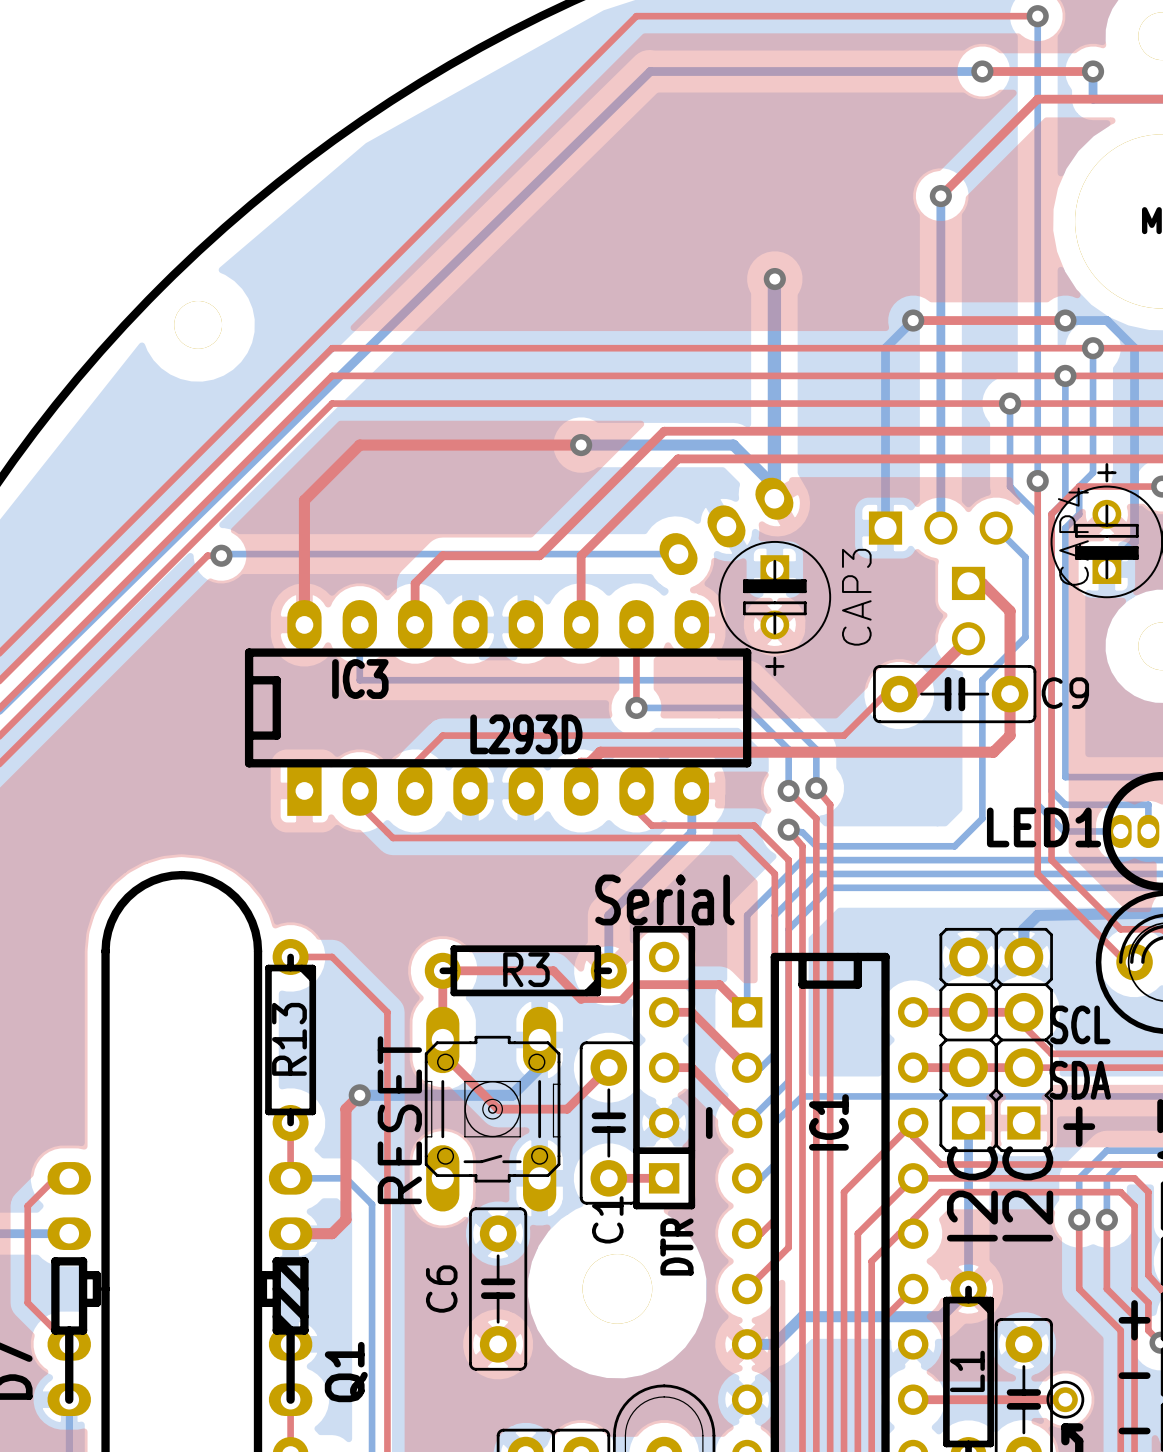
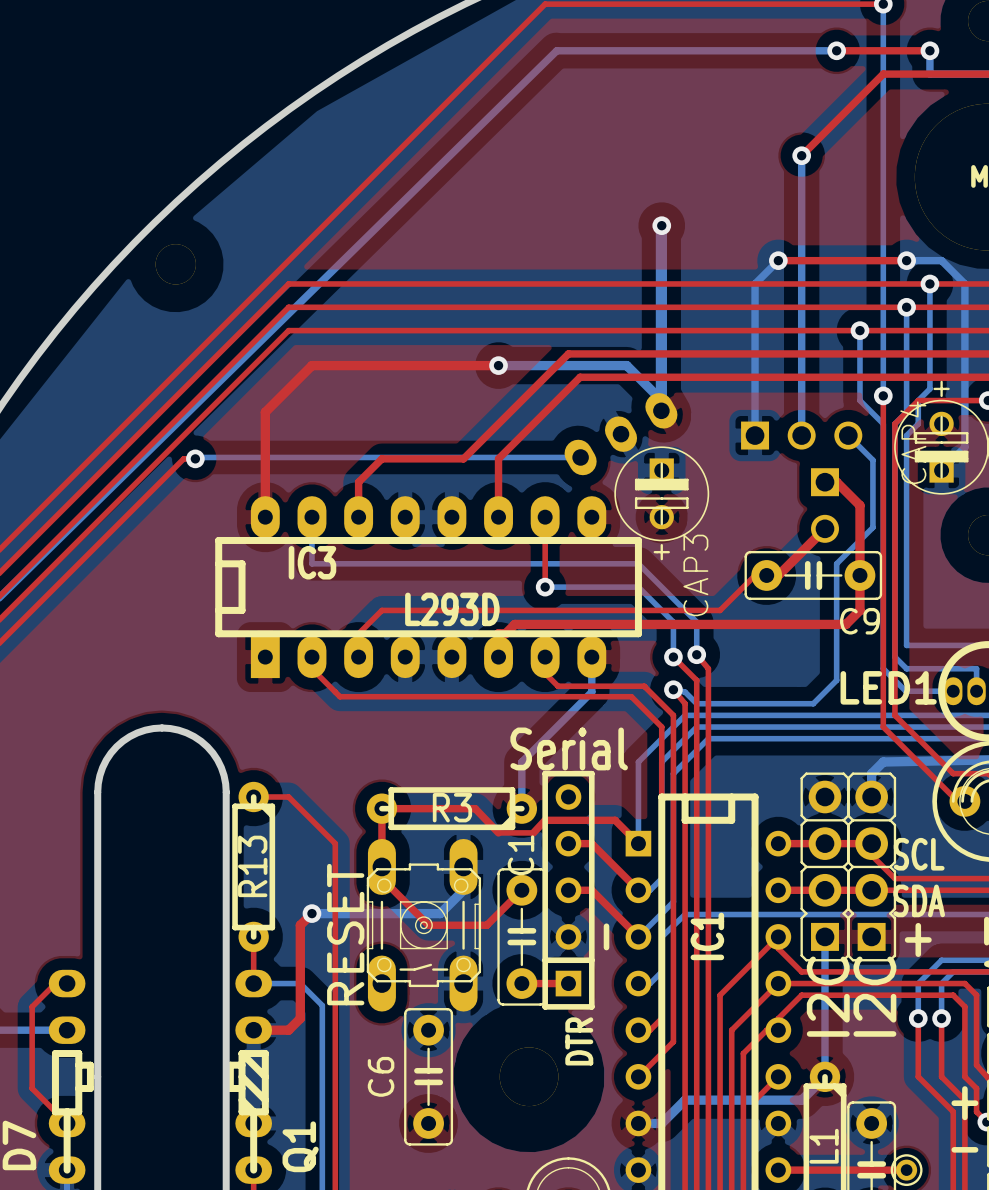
CAP3 name position: CAP3 (856, 597) -> CAP3 (695, 575)
C9 name position: C9 (1065, 693) -> C9 (859, 621)
C1 name position: C1 (607, 1219) -> C1 (520, 855)

